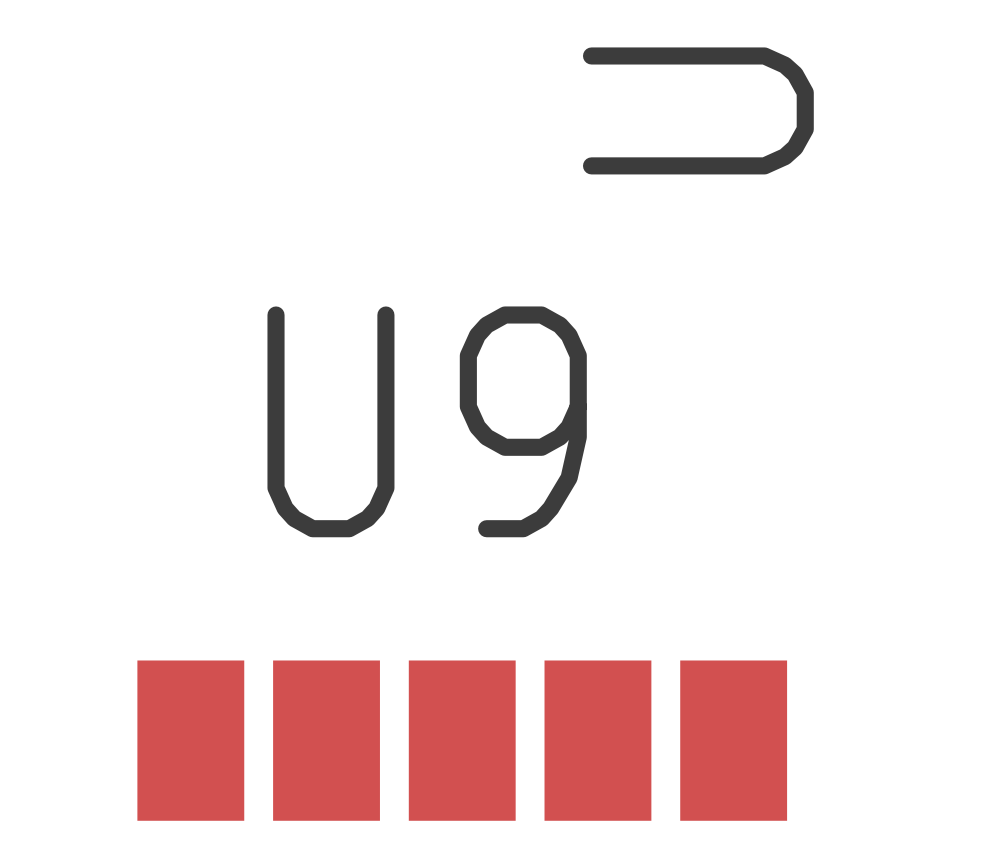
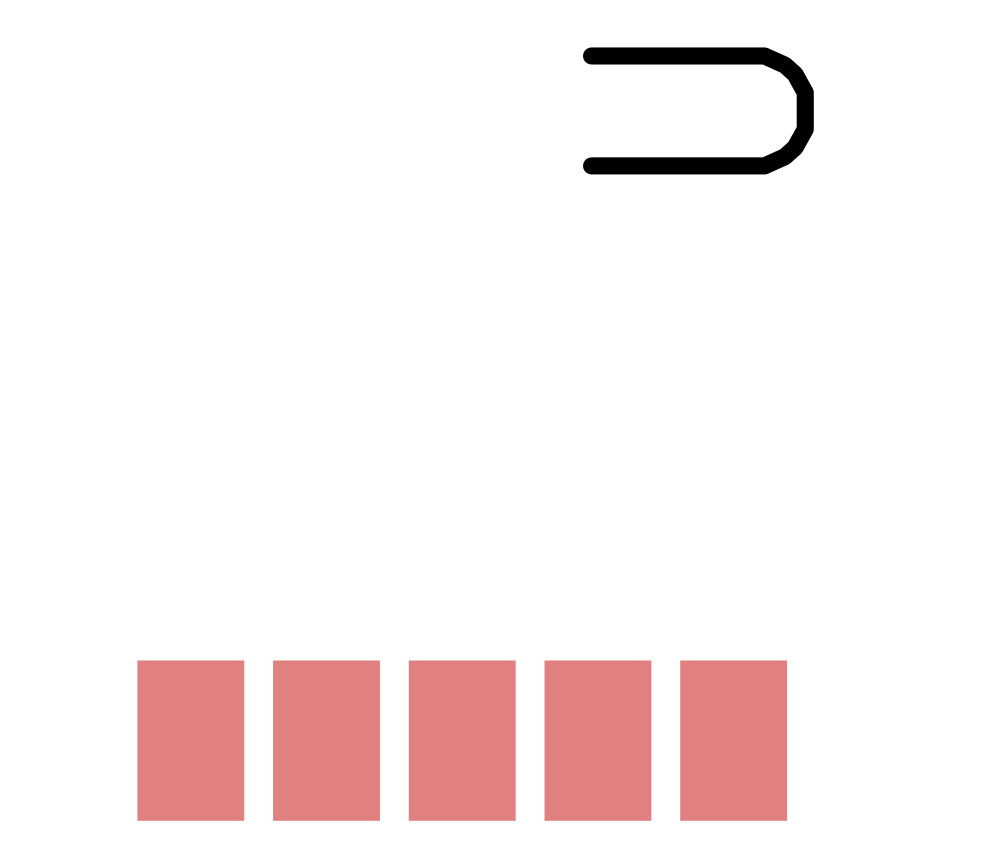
text: U9 (427, 421) -> none

